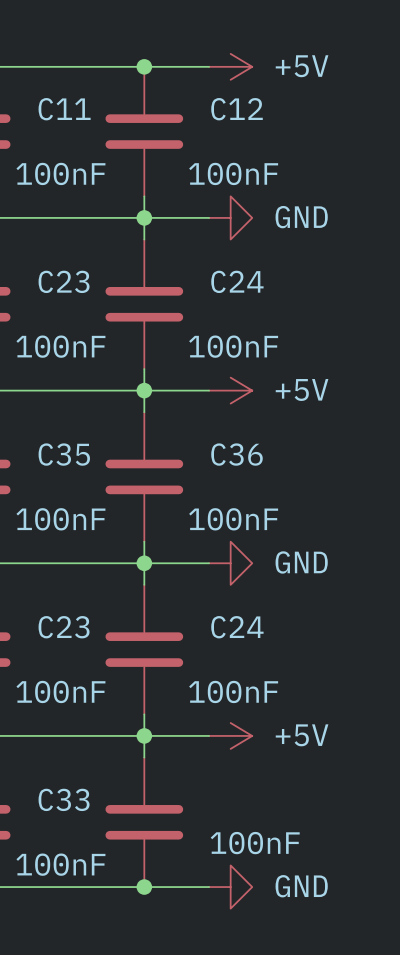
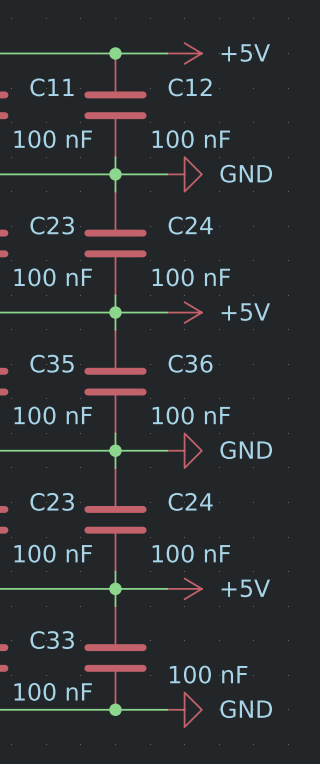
C11 value: 100nF (60, 173) -> 100 nF (53, 139)
C12 value: 100nF (233, 173) -> 100 nF (191, 139)
C23 value: 100nF (60, 346) -> 100 nF (53, 277)
C24 value: 100nF (233, 346) -> 100 nF (191, 277)
C35 value: 100nF (60, 519) -> 100 nF (53, 415)
C36 value: 100nF (233, 519) -> 100 nF (191, 415)
C23 value: 100nF (60, 691) -> 100 nF (53, 553)
C24 value: 100nF (233, 691) -> 100 nF (191, 553)
part value: 100nF (255, 843) -> 100 nF (208, 674)
C33 value: 100nF (60, 864) -> 100 nF (53, 691)

